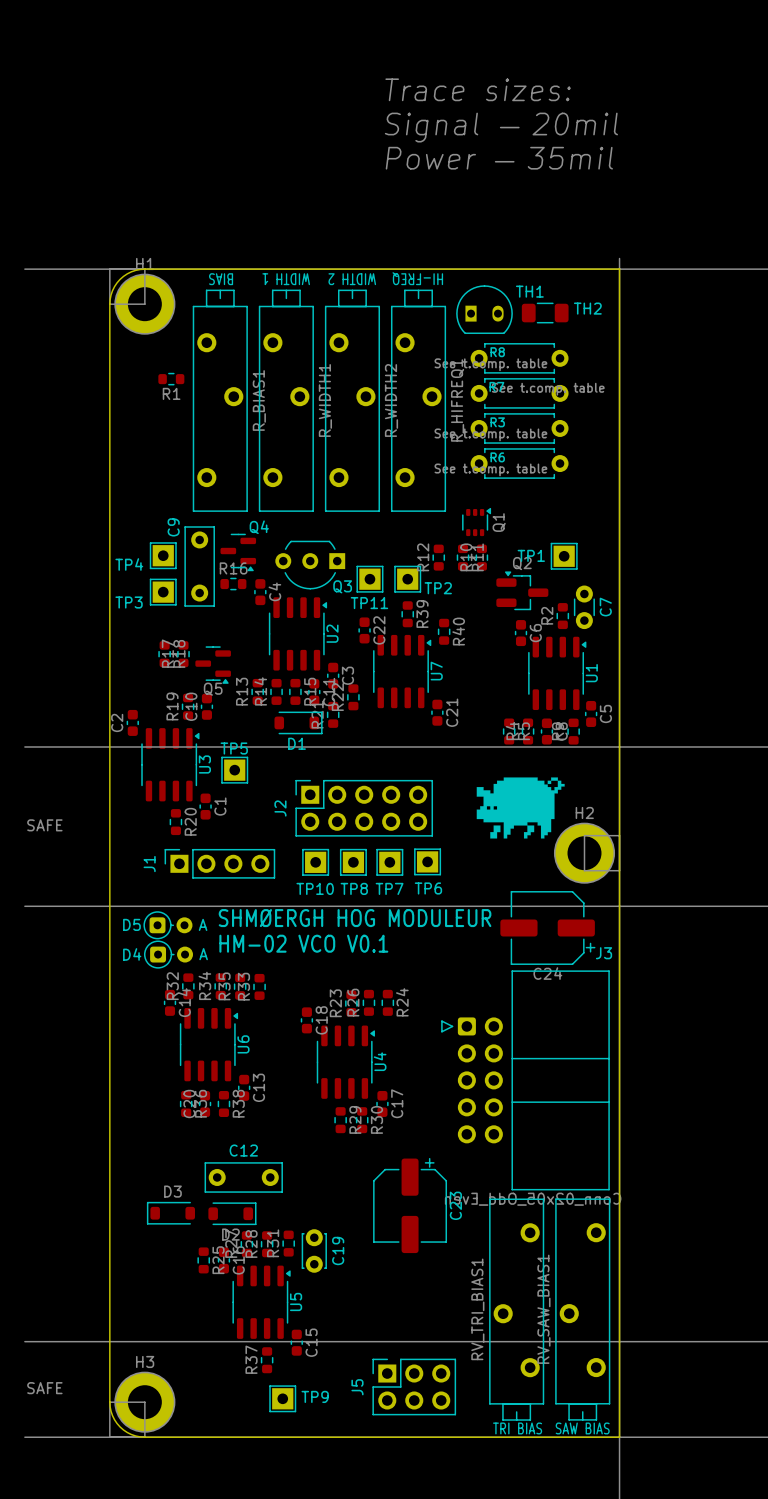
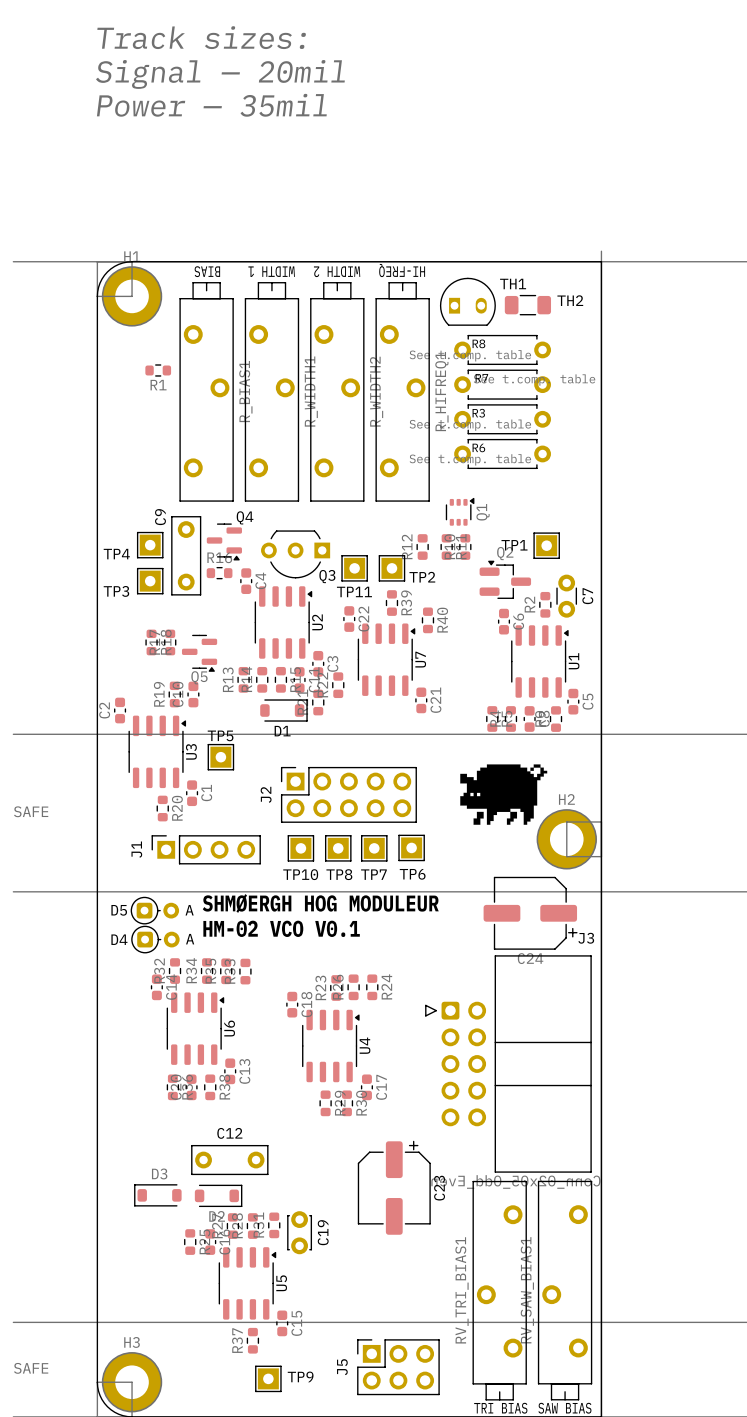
text: none -> Track sizes: (201, 37)
text: none -> Signal — 20mil (220, 74)
text: Trace sizes: (478, 89) -> none
text: none -> Power — 35mil (211, 105)
text: Signal — 20mil (501, 127) -> none
text: Power — 35mil (499, 158) -> none

